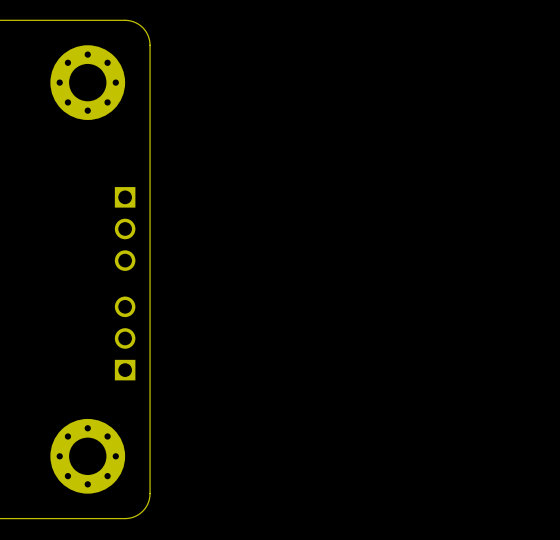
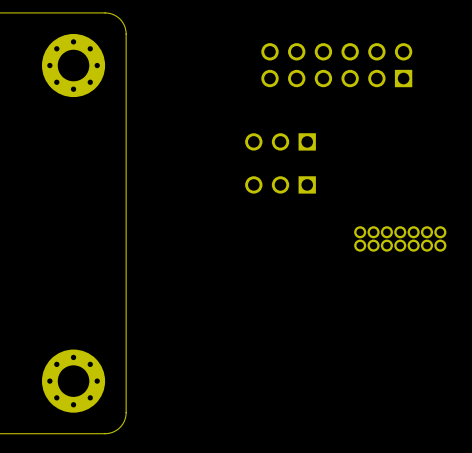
part: none -> (336, 65)
part: none -> (280, 141)
part: none -> (280, 184)
part: (125, 228) -> none
part: none -> (400, 238)
part: (125, 338) -> none

